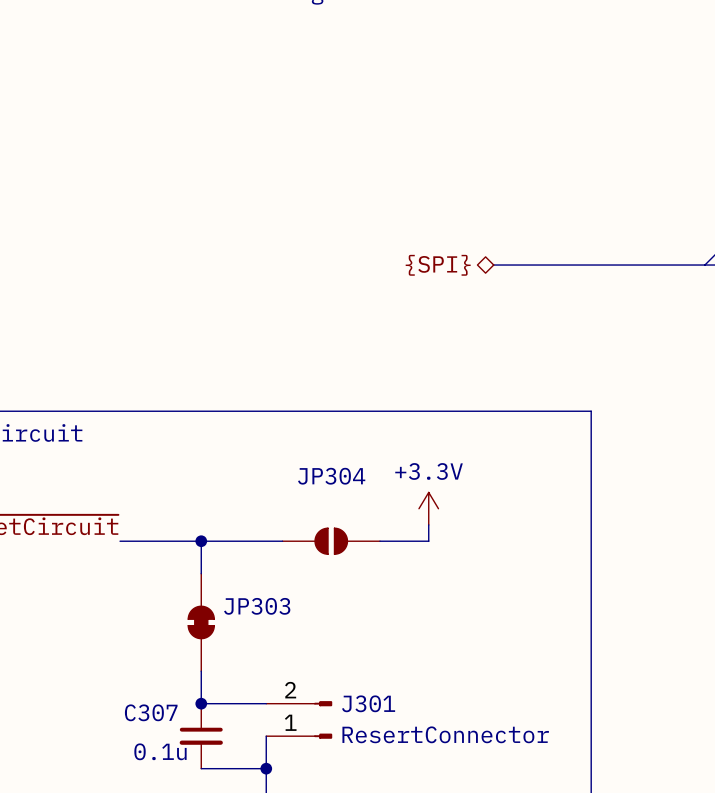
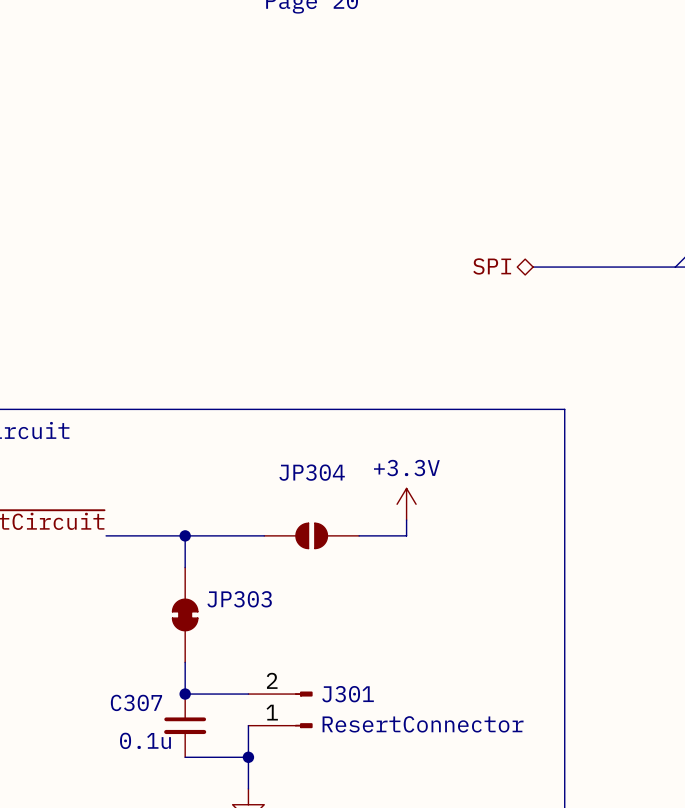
hierarchical label: none -> SPI (492, 266)
hierarchical label: {SPI} (438, 265) -> none
bus: (493, 265) (558, 265) -> none

